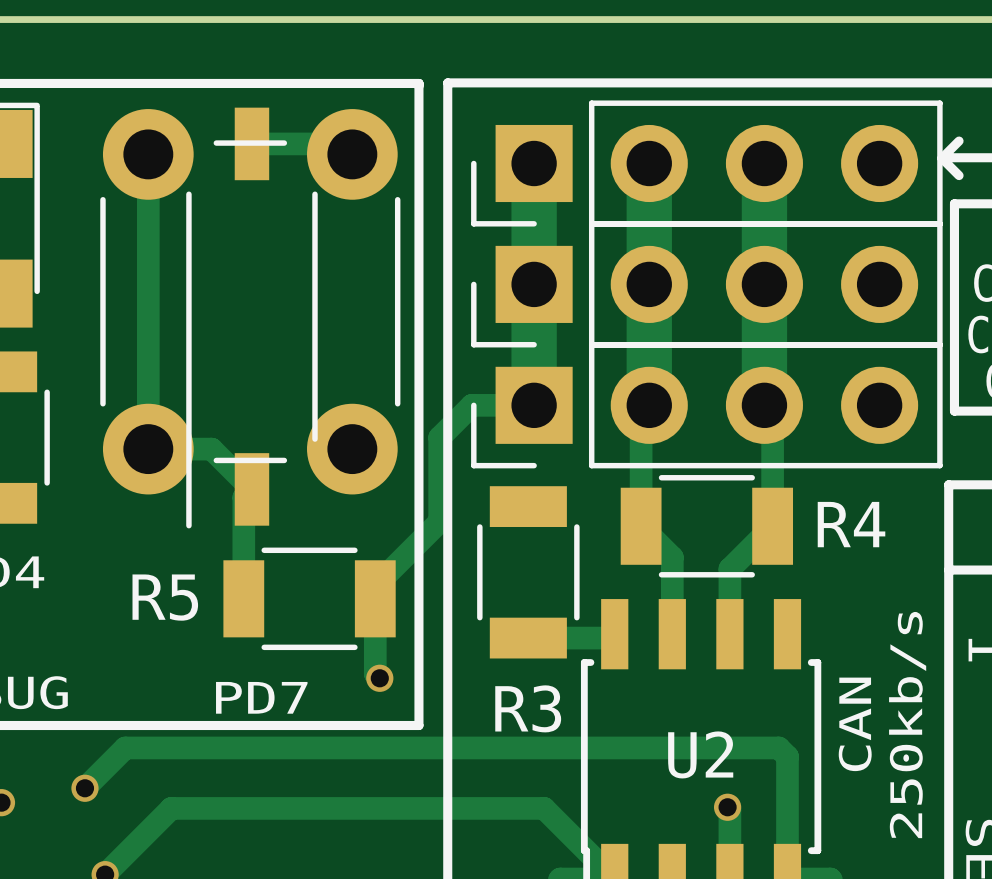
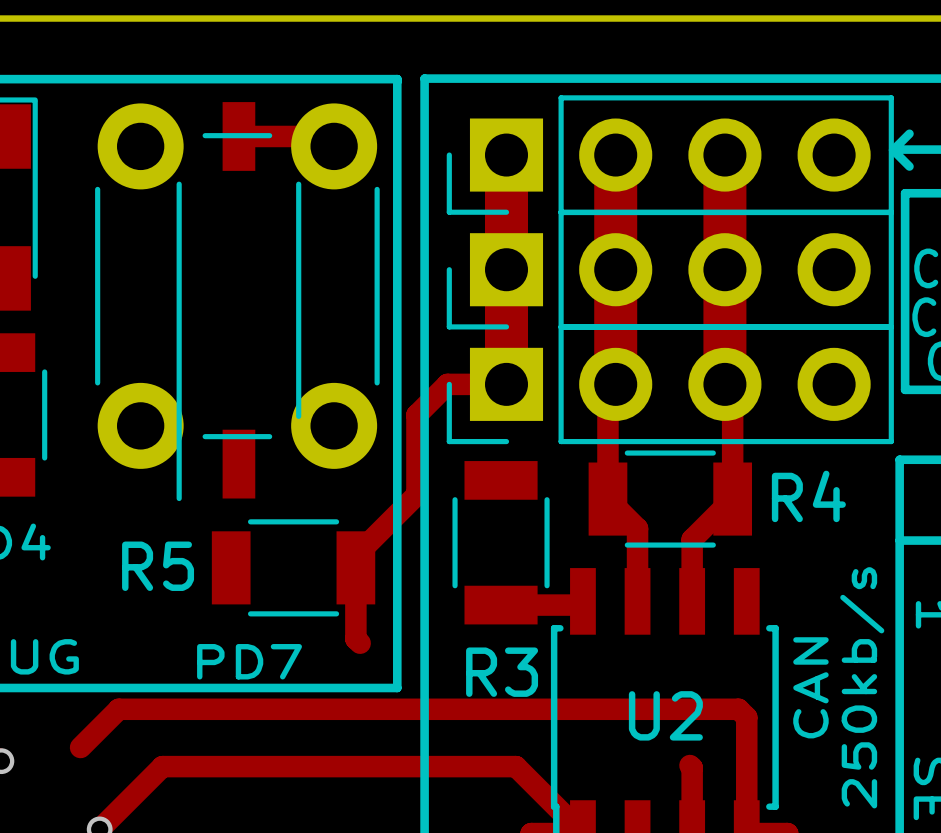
track: (148, 154) (148, 449) (211, 449) (251, 489) (243, 497) (243, 598) -> none
via: (379, 678) -> none
via: (84, 788) -> none
via: (727, 807) -> none

